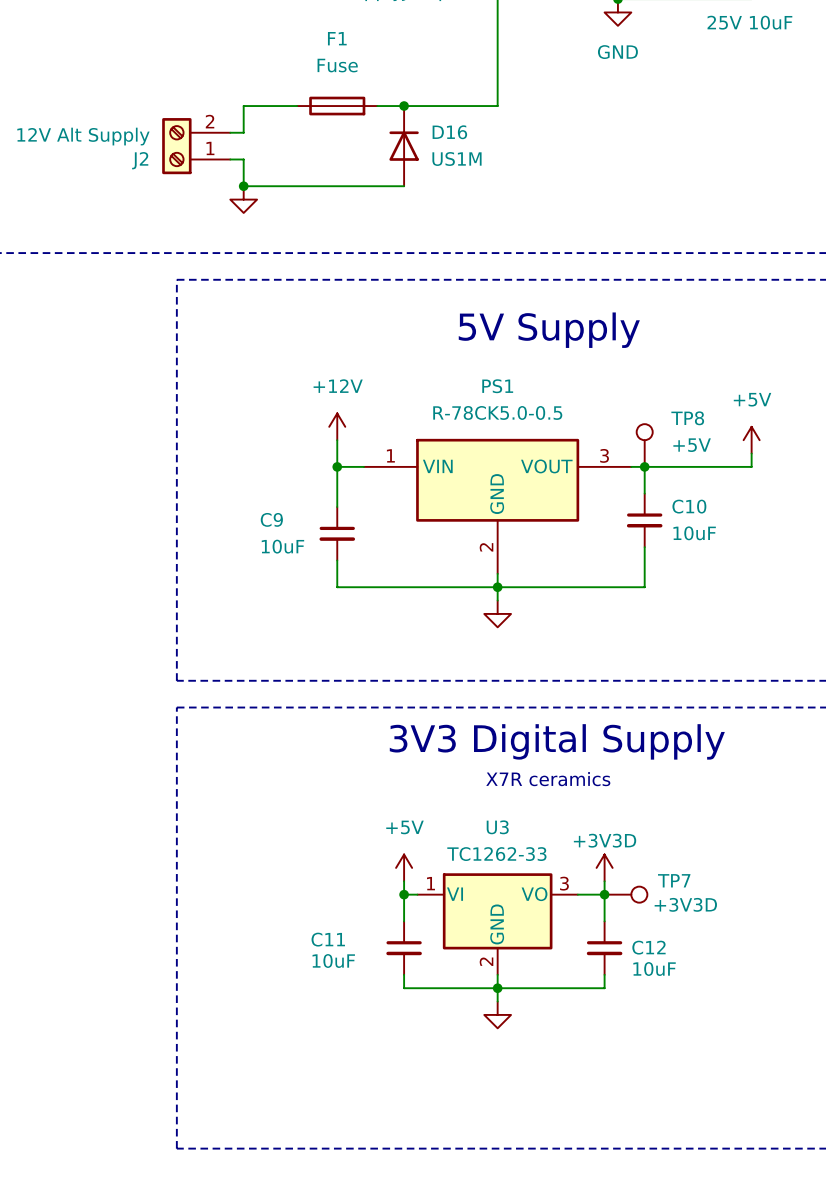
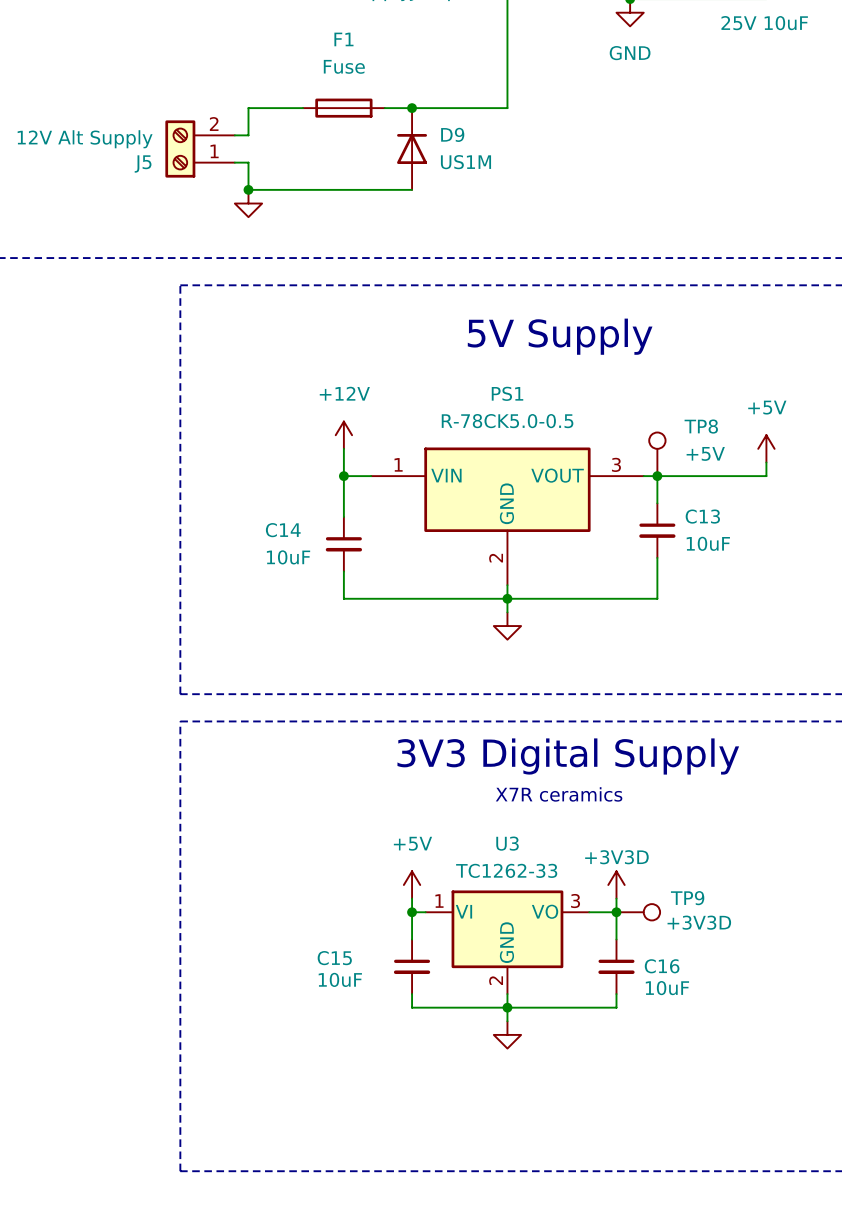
D16 name: D16 (449, 132) -> D9 (452, 134)
J2 name: J2 (140, 160) -> J5 (143, 163)
C10 name: C10 (689, 506) -> C13 (702, 516)
C9 name: C9 (271, 519) -> C14 (283, 530)
TP7 name: TP7 (674, 880) -> TP9 (687, 898)
C11 name: C11 (328, 939) -> C15 (334, 958)
C12 name: C12 (648, 947) -> C16 (662, 966)

